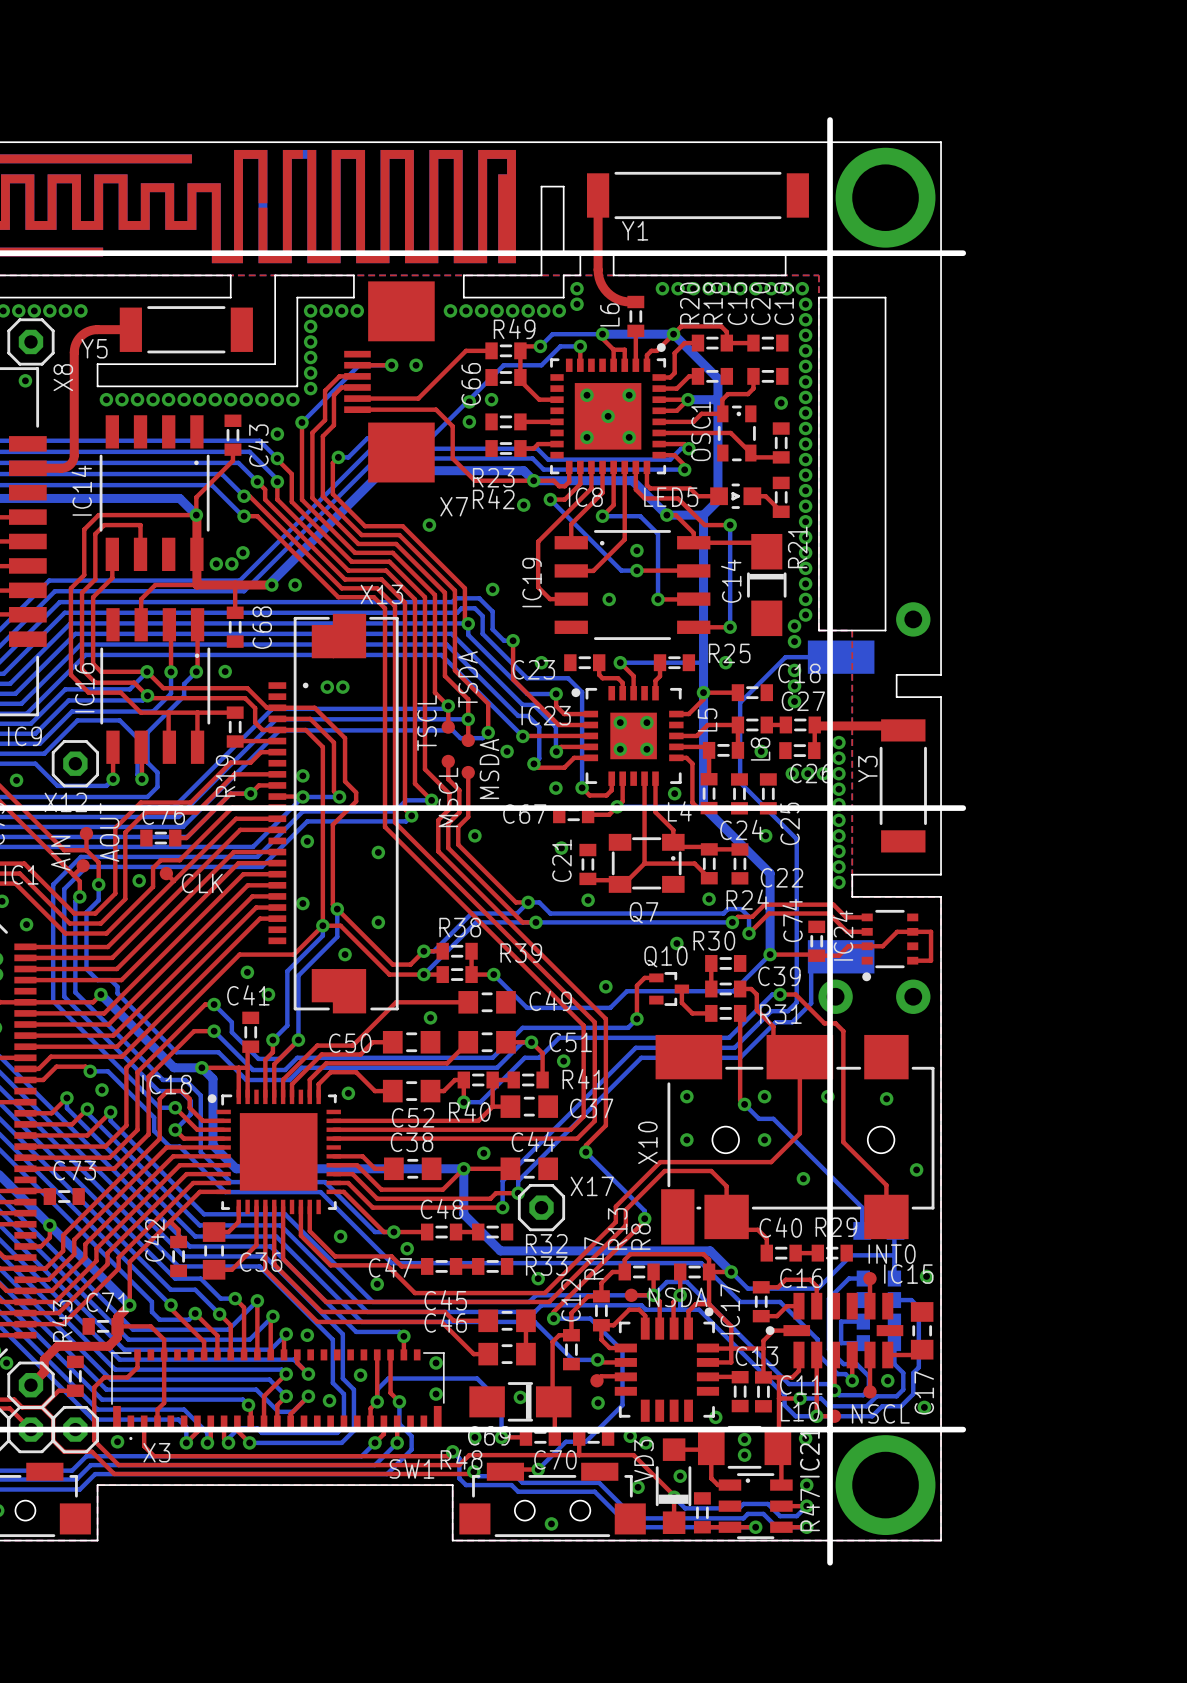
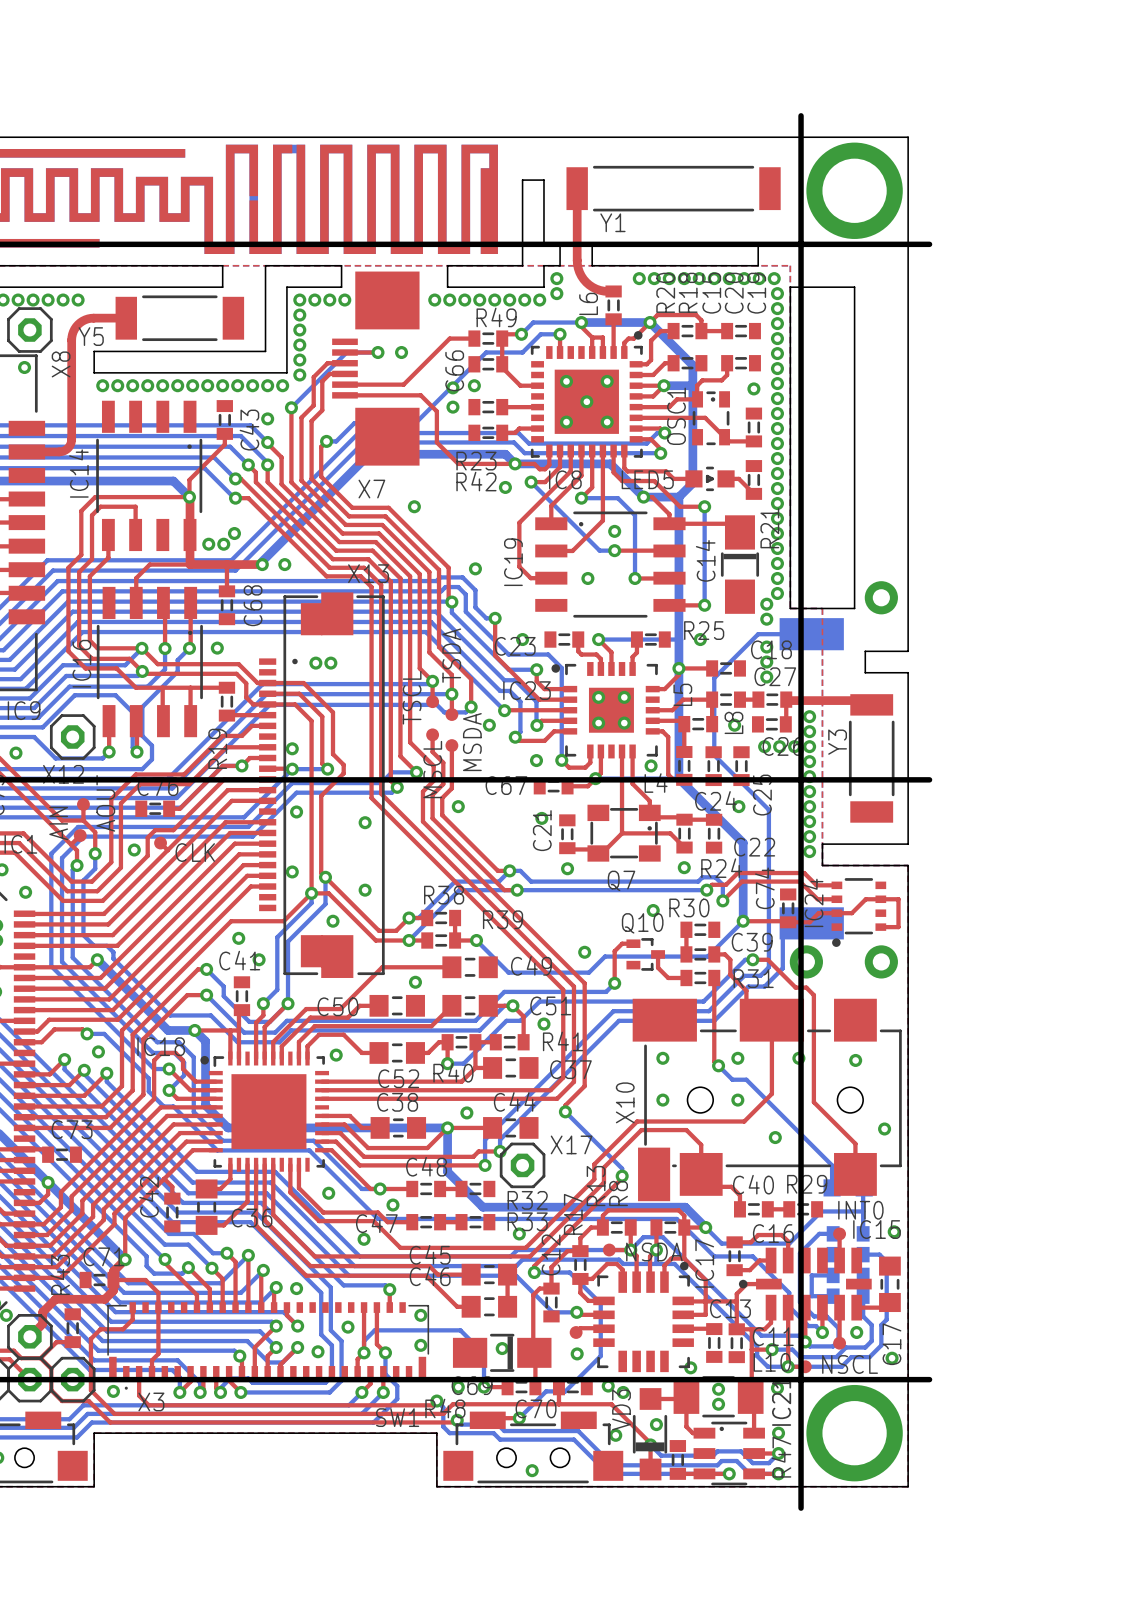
X7 name position: X7 (454, 506) -> X7 (371, 489)

